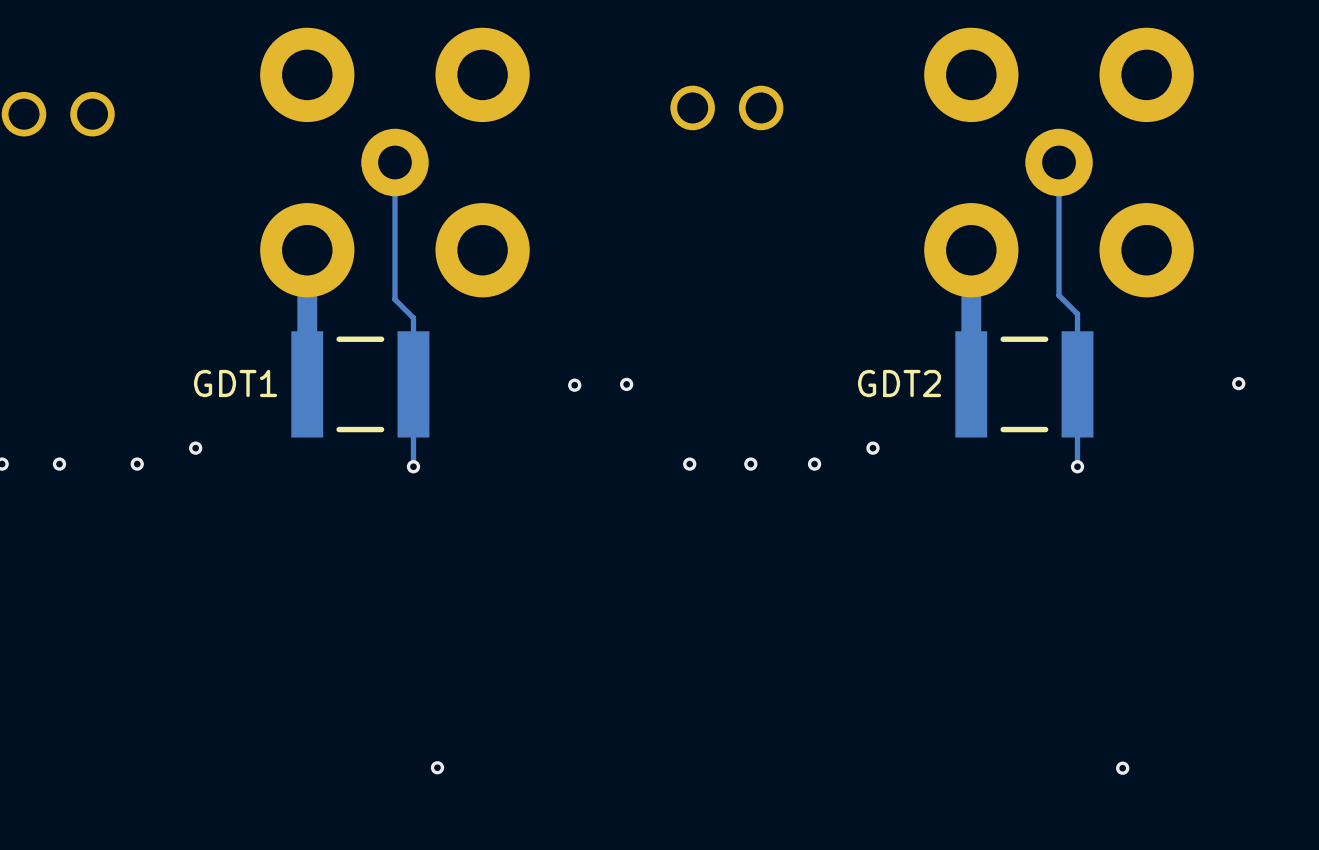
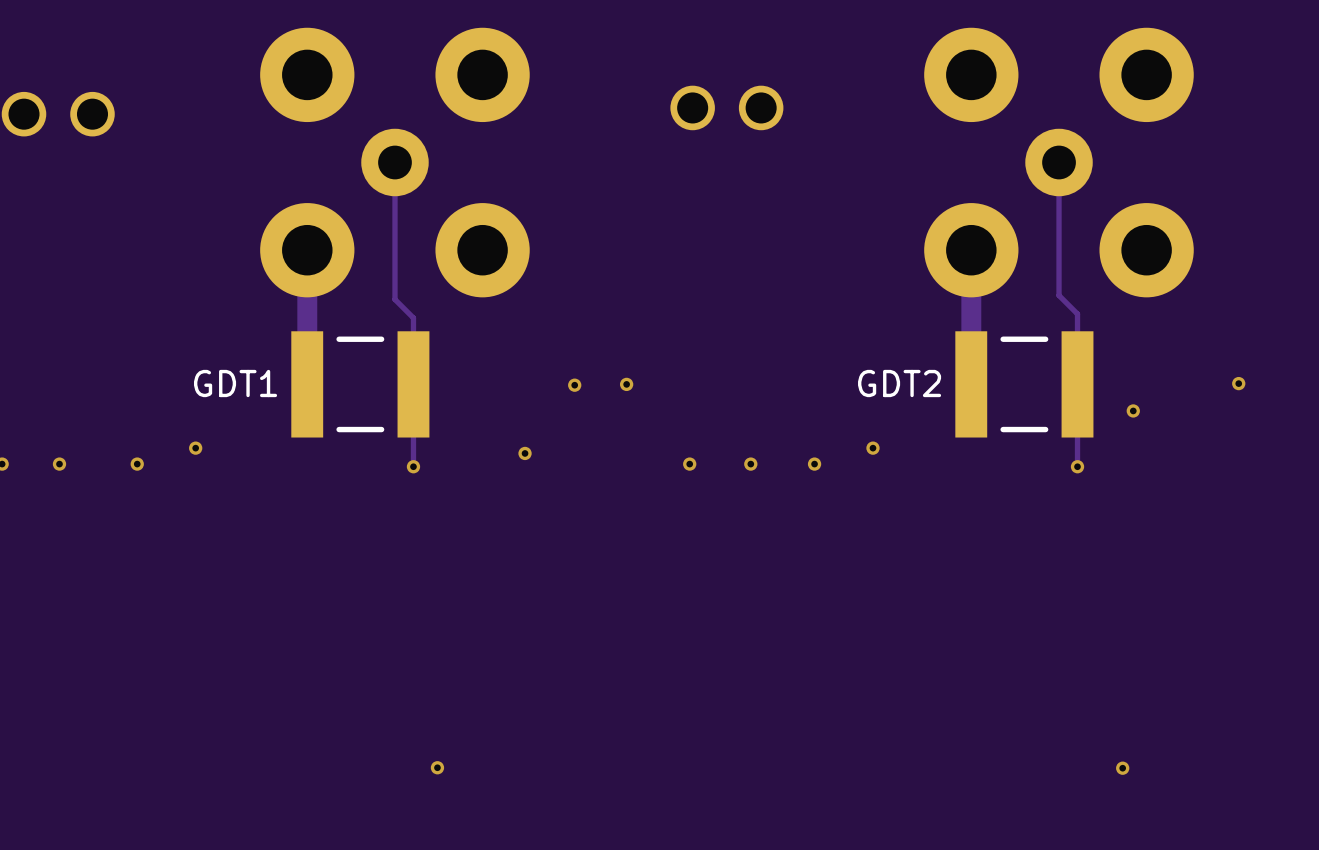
via: none -> (1133, 410)
via: none -> (525, 453)

